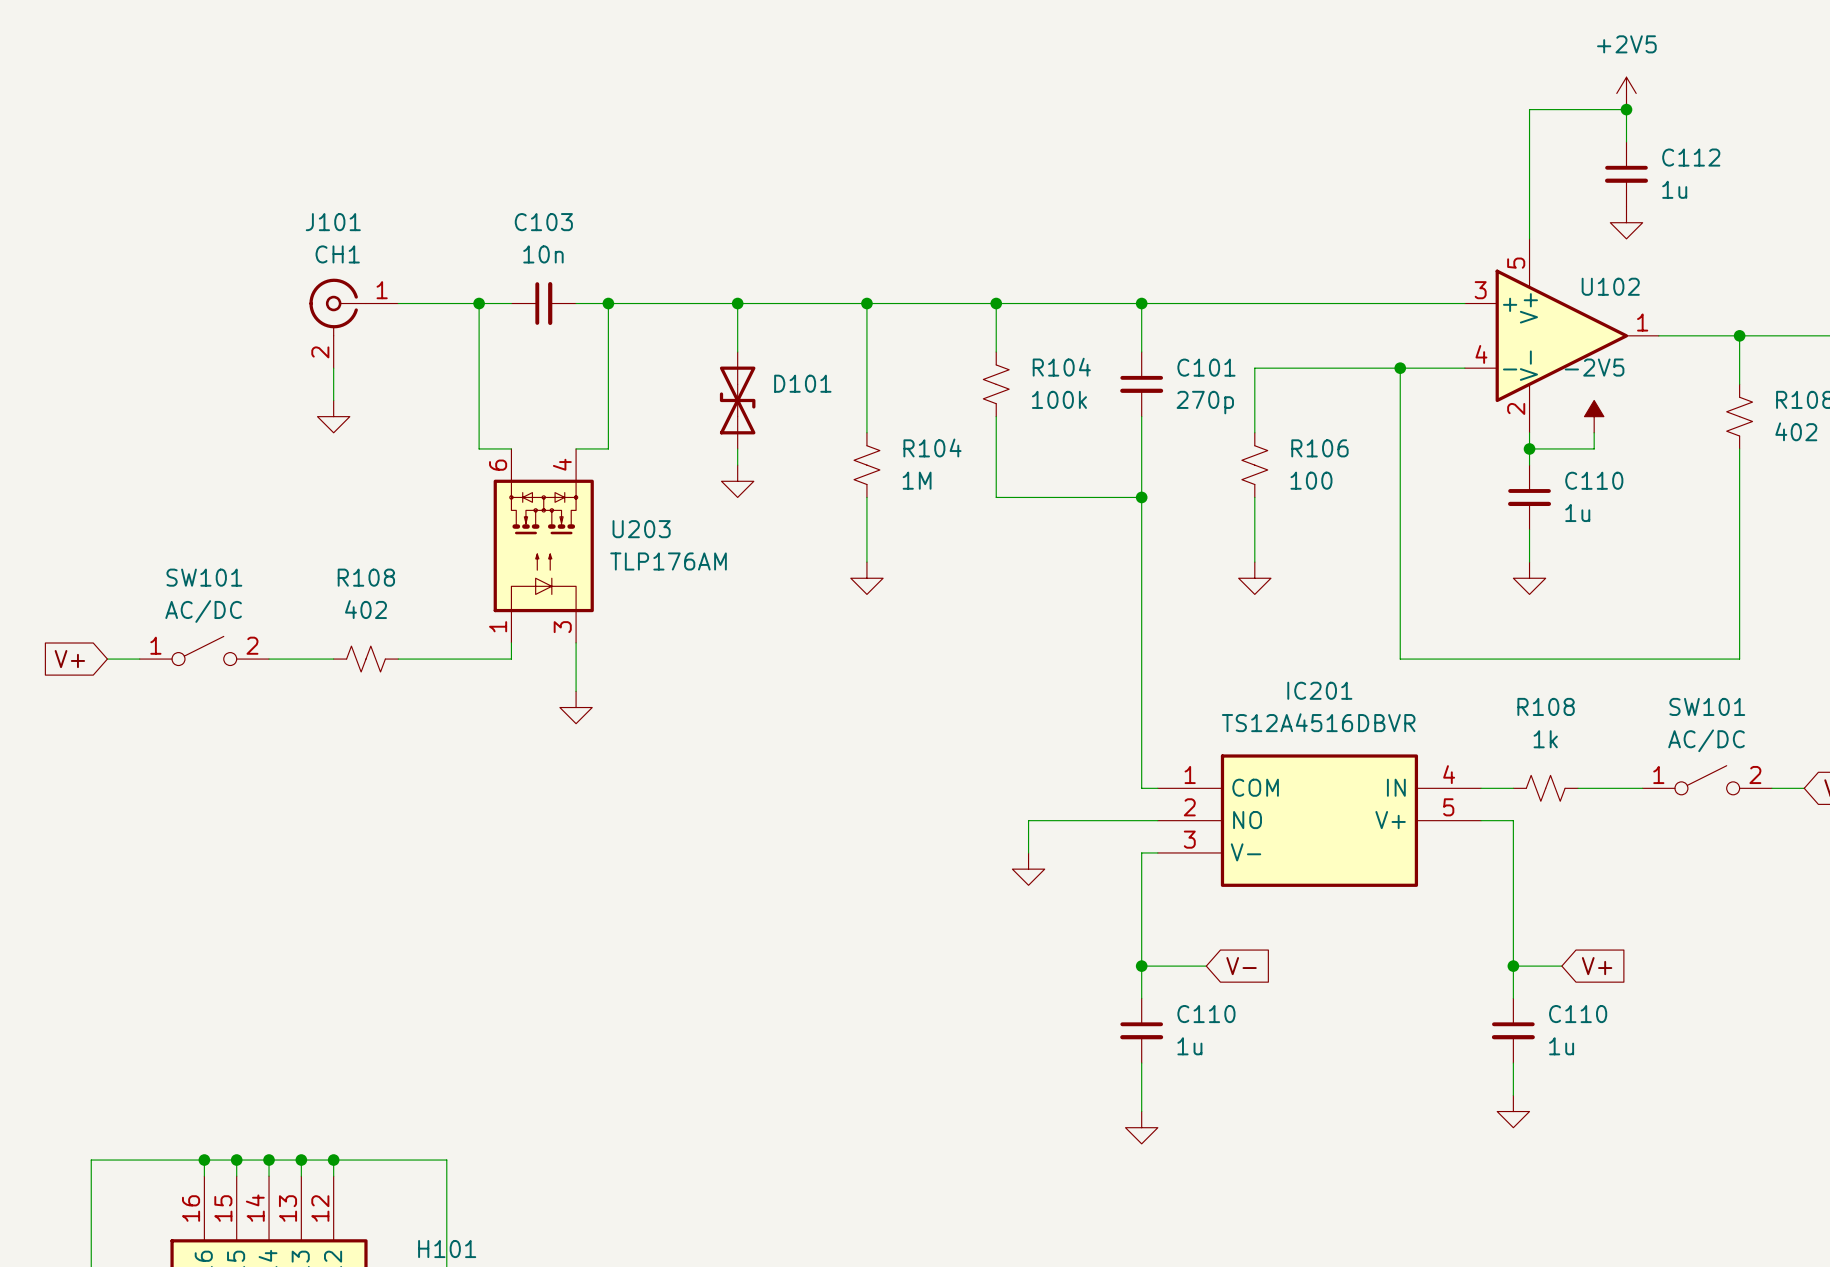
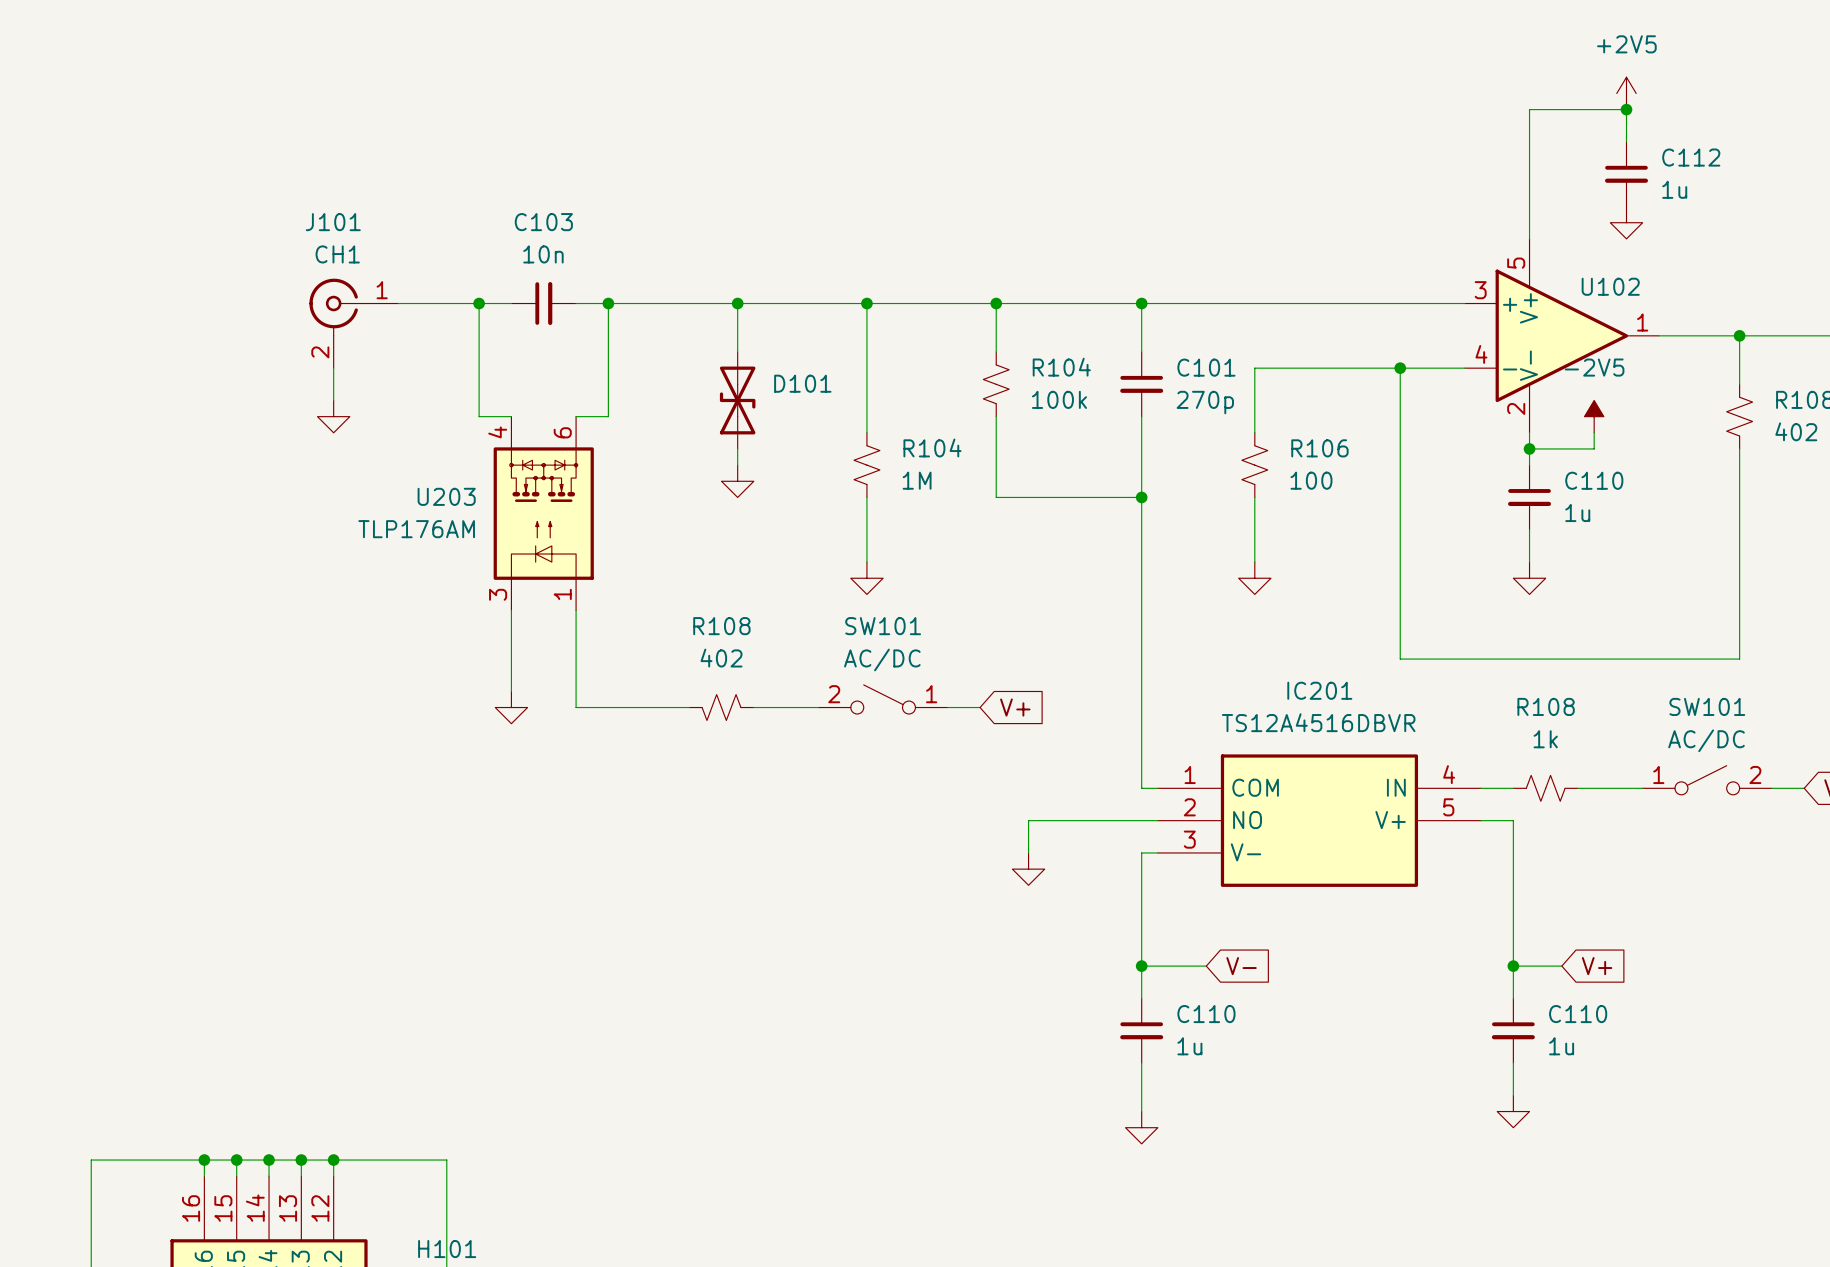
wire: (479, 416) (479, 448) (511, 448) -> (479, 416) (511, 416)
wire: (608, 416) (608, 448) (576, 448) -> (608, 416) (576, 416)
U203 flip: as is (543, 545) -> left-right (543, 513)
SW101: AC/DC (204, 650) -> none
global label: V+ (69, 659) -> none
wire: (107, 659) (139, 659) -> none
wire: (269, 659) (333, 659) -> none
R108: 402 (365, 659) -> none
wire: (398, 659) (511, 659) -> (511, 691) (511, 659)
wire: none -> (576, 691) (576, 707) (689, 707)
SW101: none -> AC/DC (883, 699)
power symbol position: (576, 707) -> (511, 707)
R108: none -> 402 (721, 707)
wire: none -> (753, 707) (818, 707)
wire: none -> (947, 707) (980, 707)
global label: none -> V+ (1015, 707)

